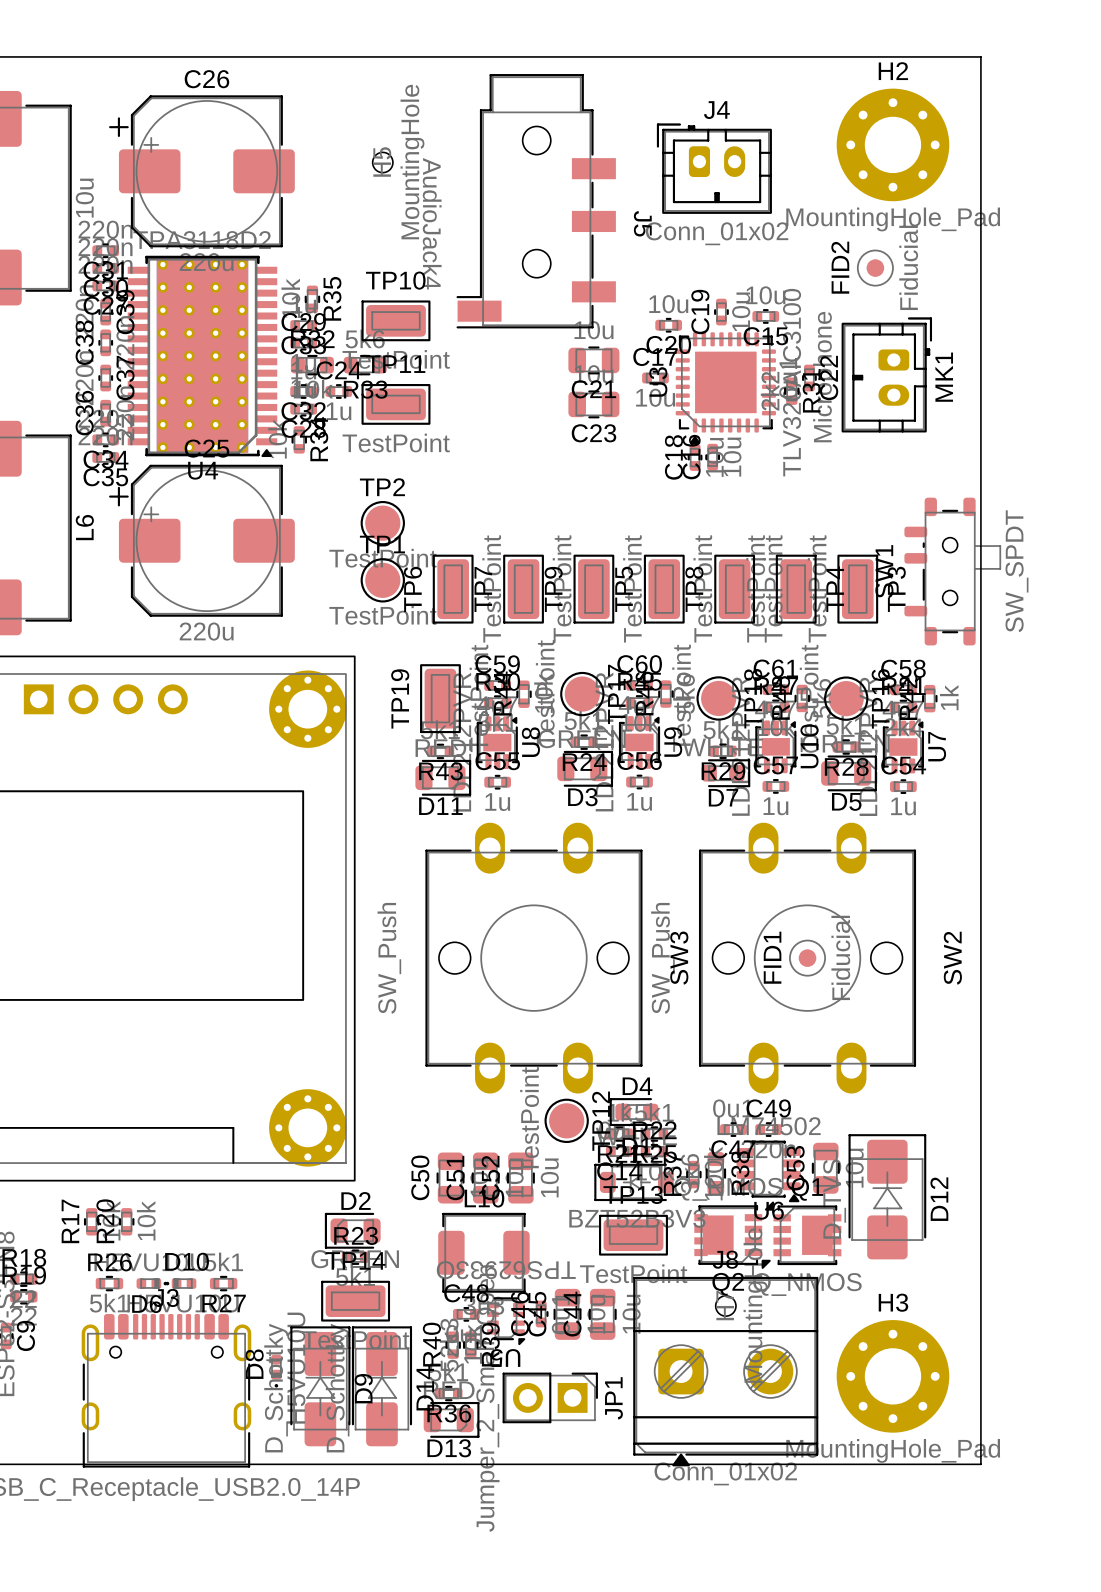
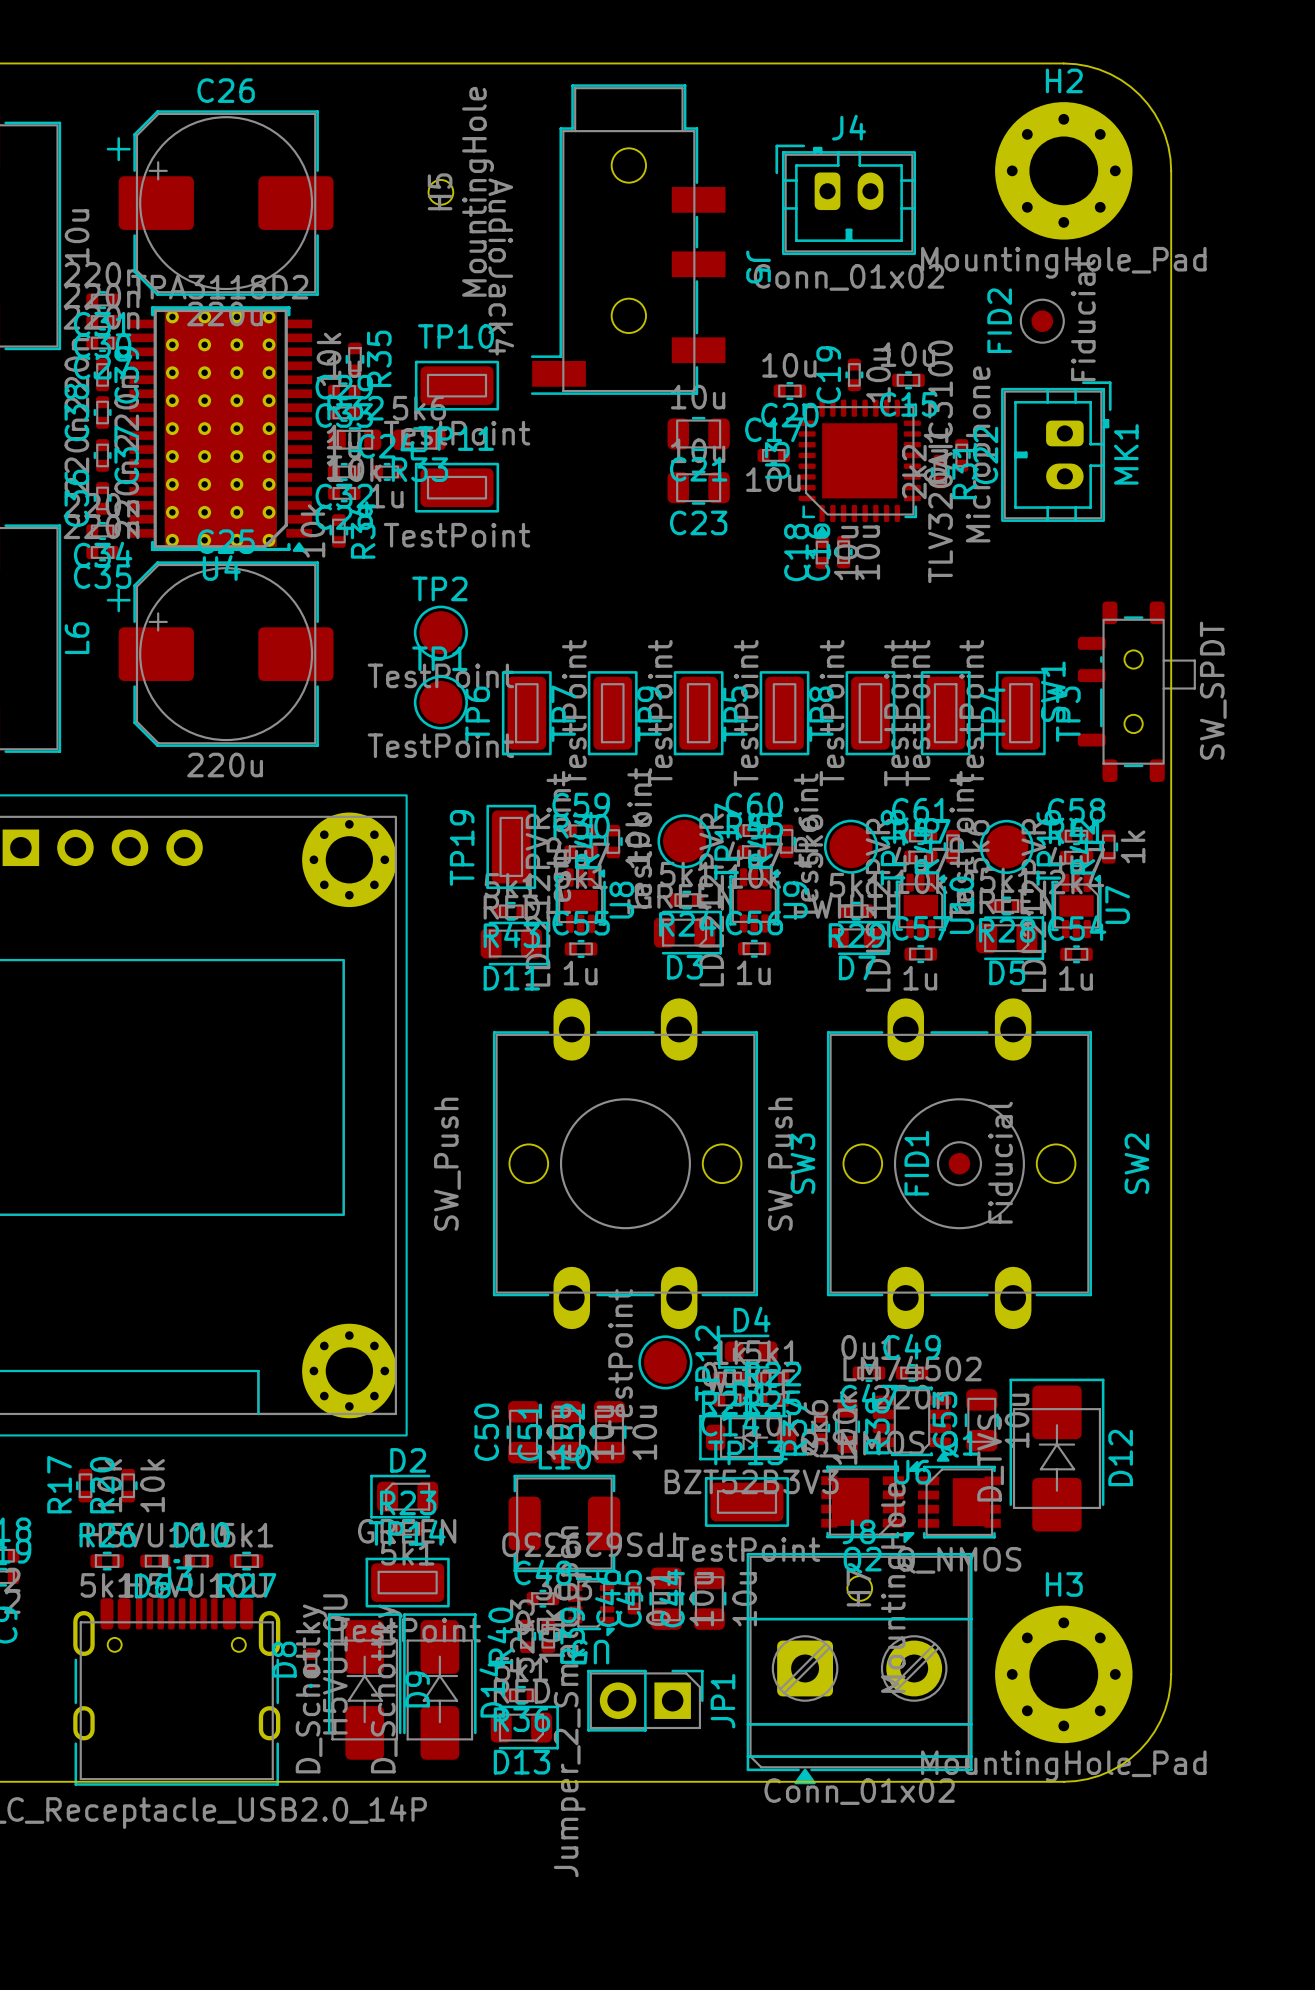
board edge: (892, 56) (980, 56) (980, 144) -> (1063, 63) (1099, 69) (1120, 79) (1139, 94) (1154, 113) (1165, 135) (1171, 170)
board edge: (980, 1376) (980, 1464) (892, 1464) -> (1171, 1674) (1165, 1709) (1154, 1731) (1139, 1750) (1120, 1765) (1099, 1775) (1063, 1781)

